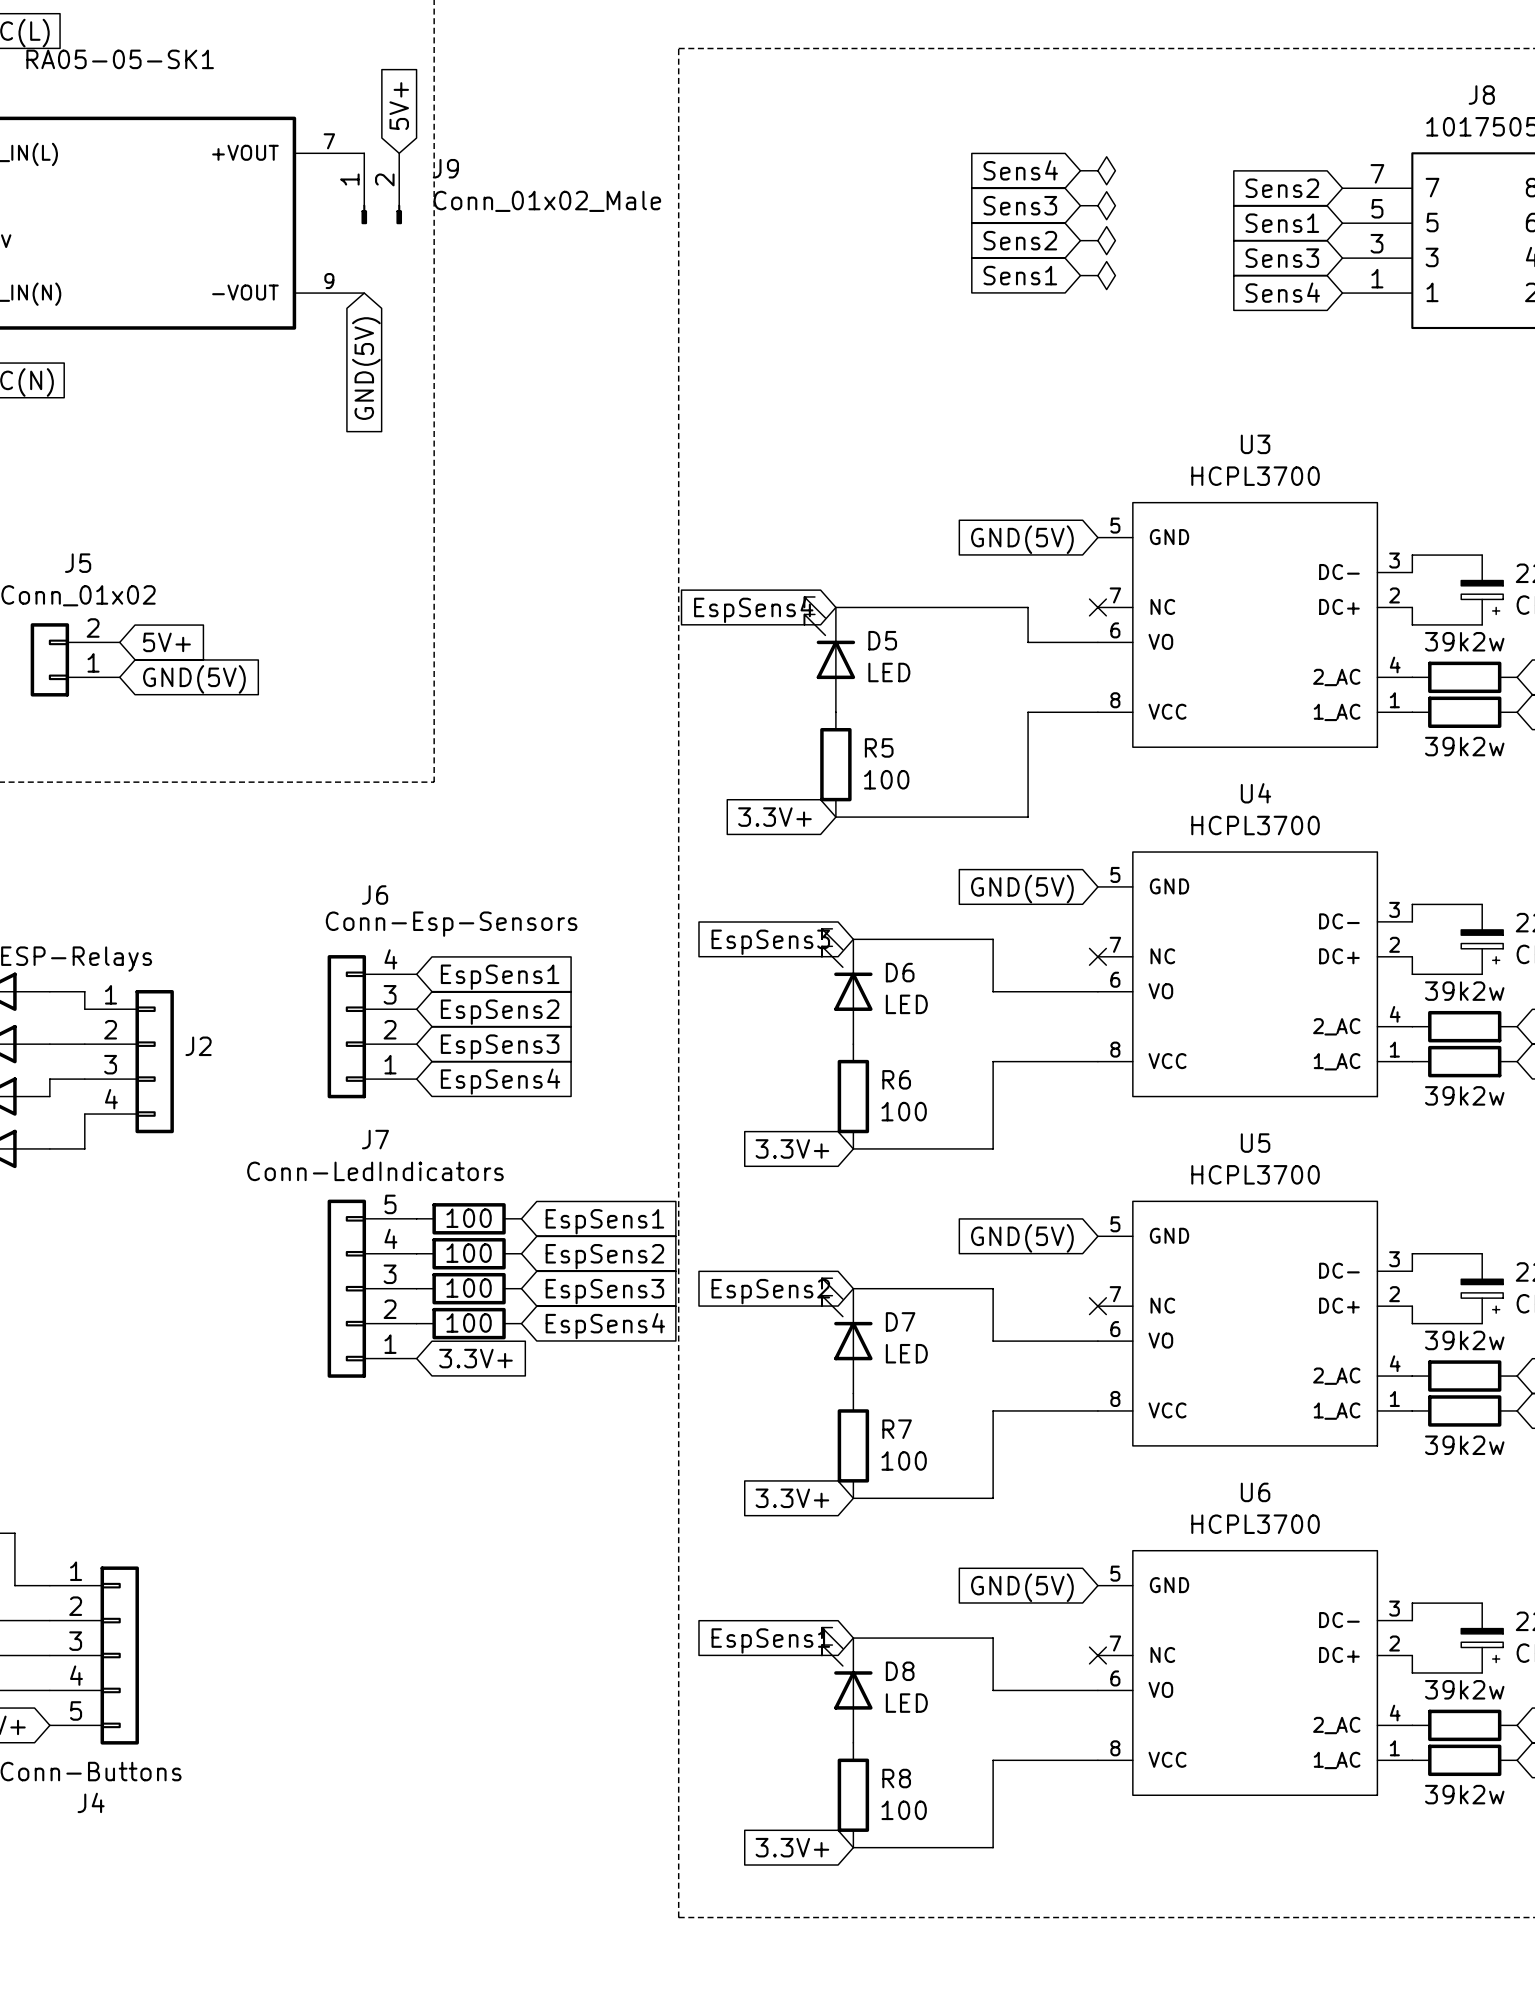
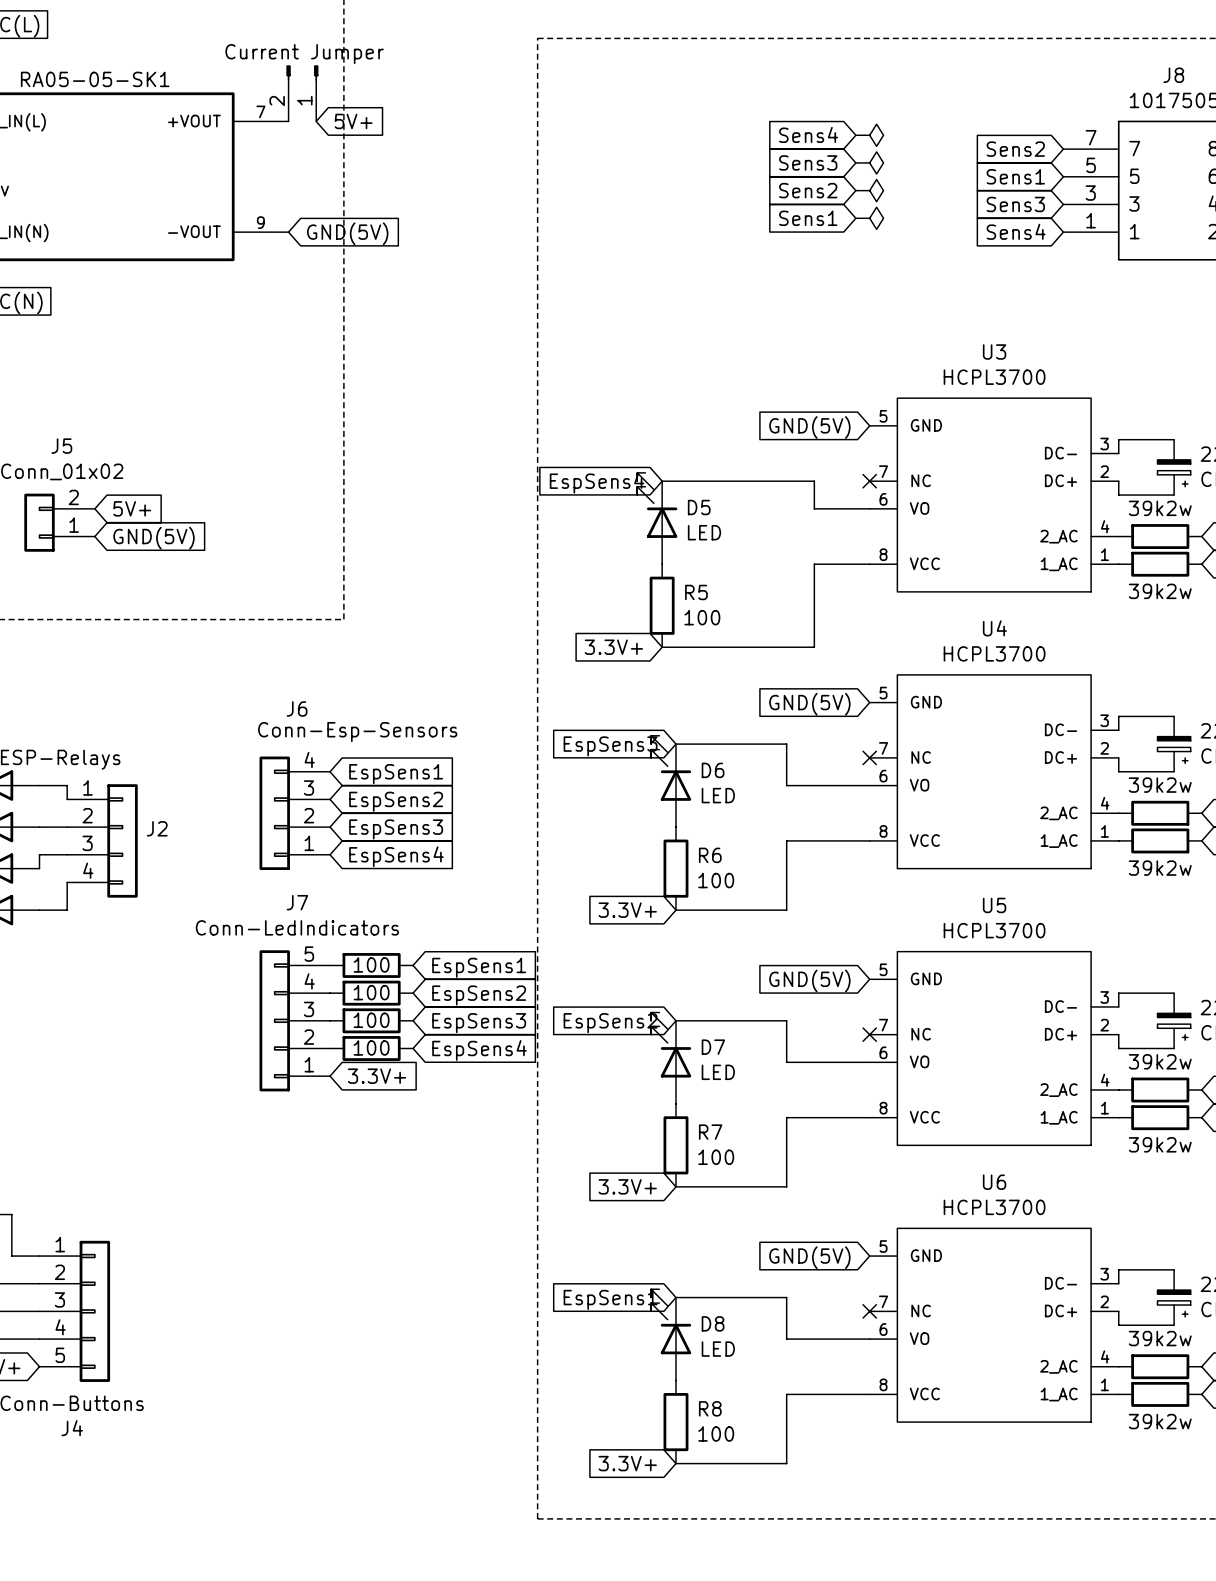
RA05-05-SK1 name position: RA05-05-SK1 (120, 59) -> RA05-05-SK1 (95, 79)
global label rotation: 0° (399, 106) -> 90° clockwise (353, 121)
part: none -> Current Jumper (302, 93)
J9: Conn_01x02_Male (381, 188) -> none
global label rotation: 0° (366, 368) -> 90° counterclockwise (347, 233)

